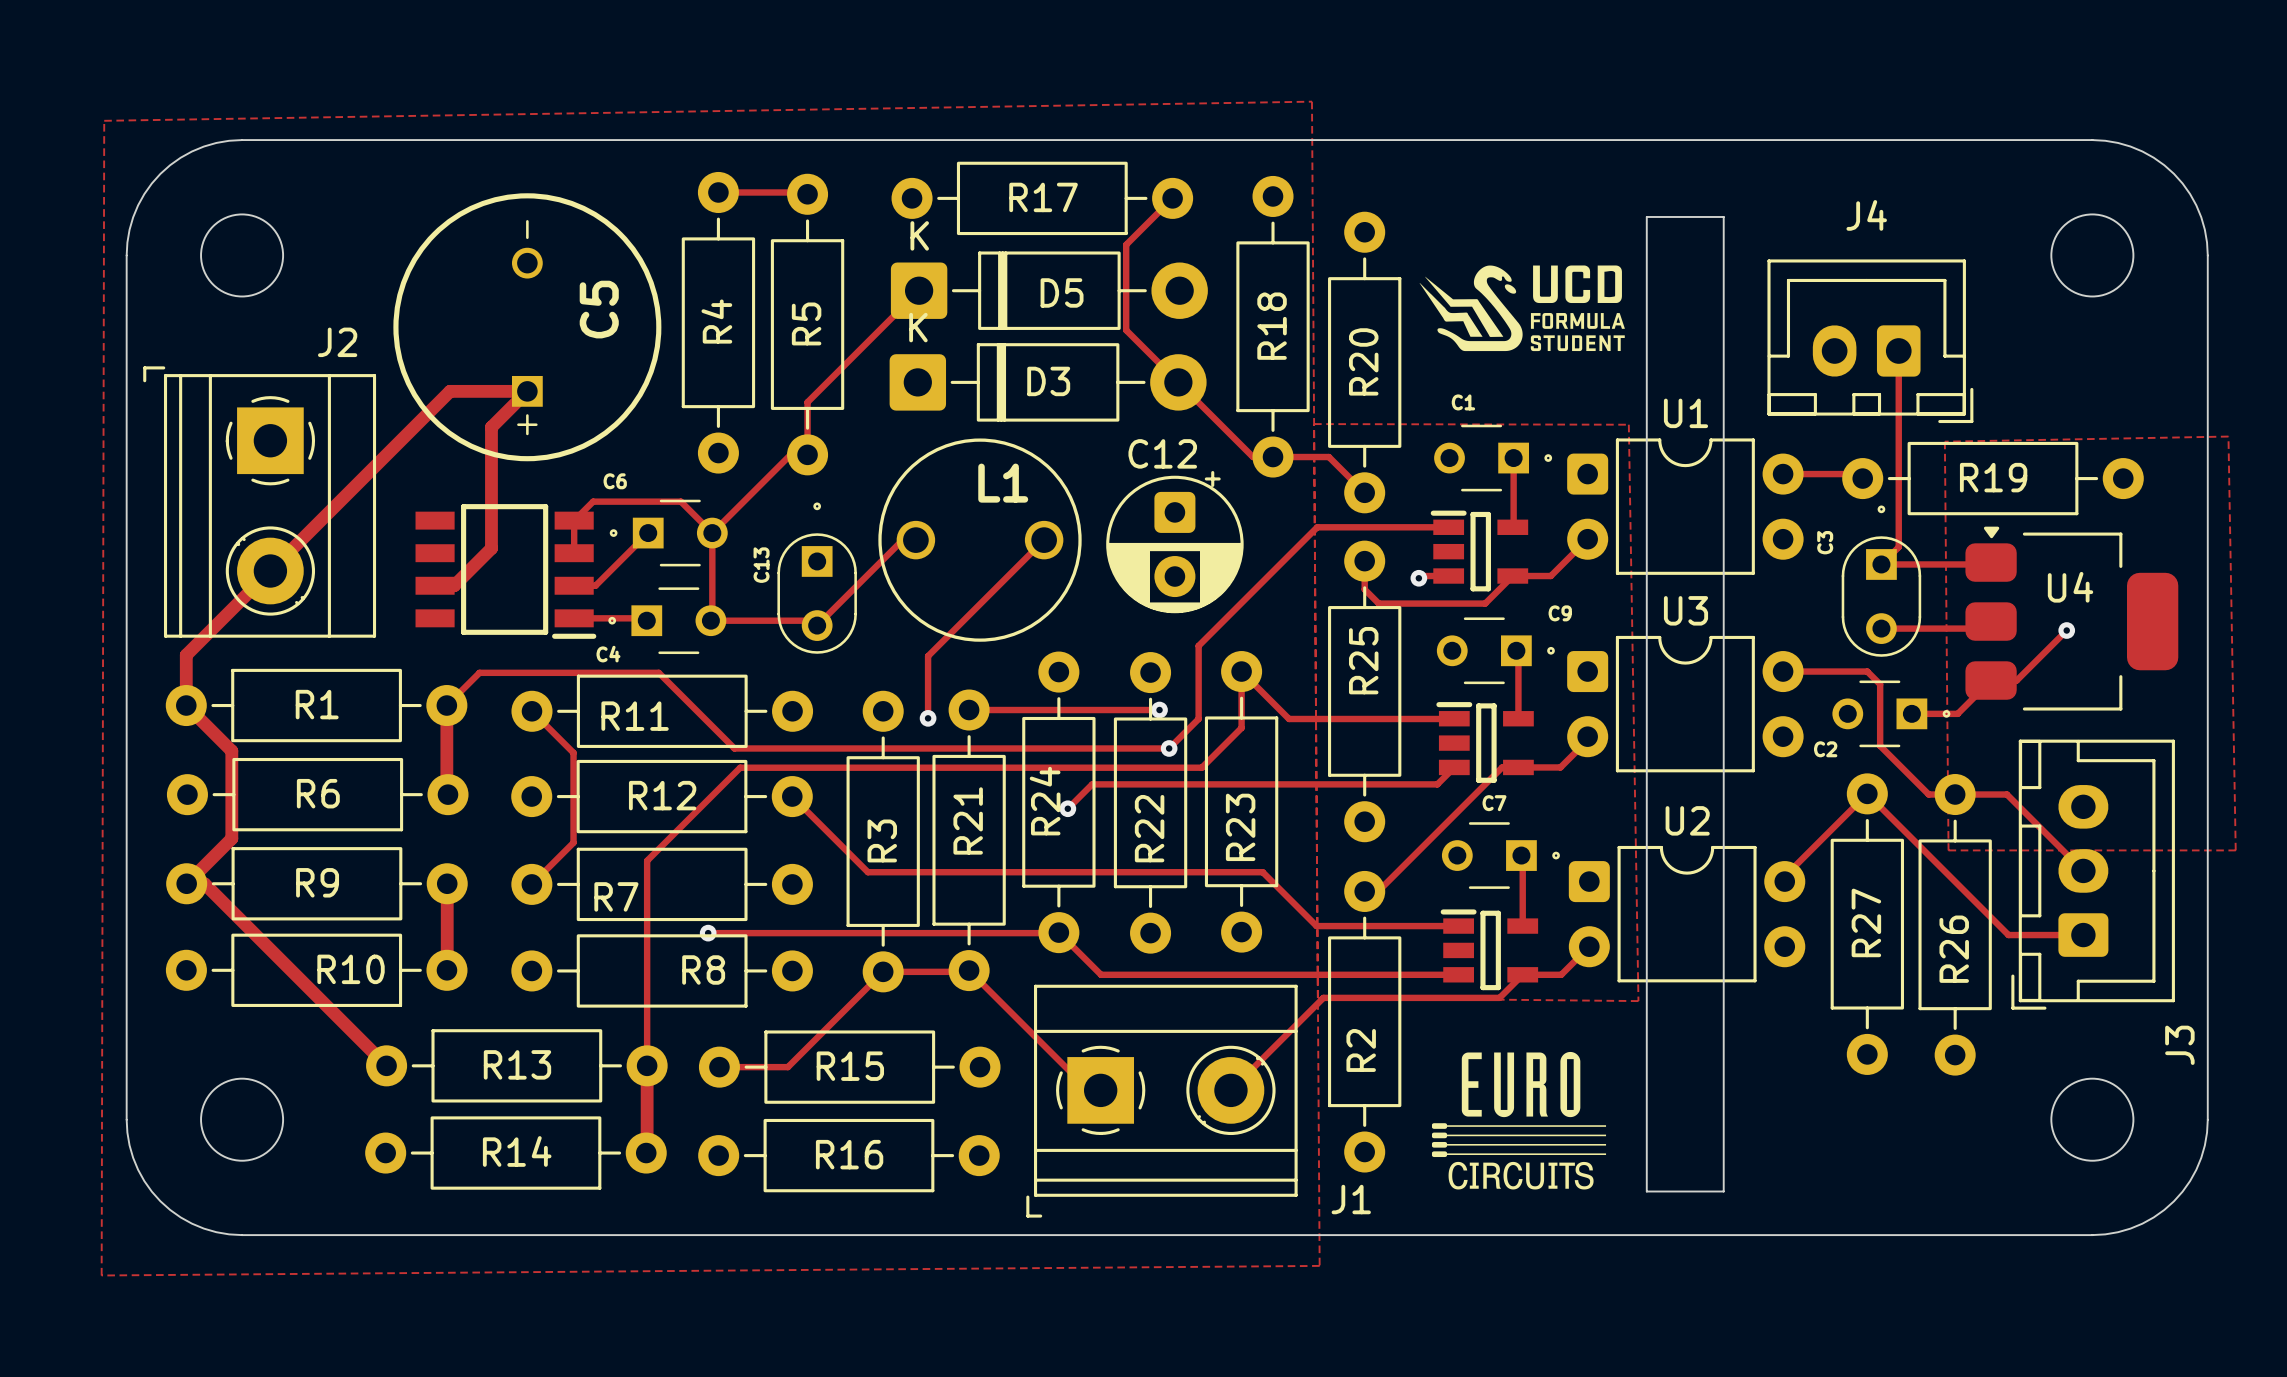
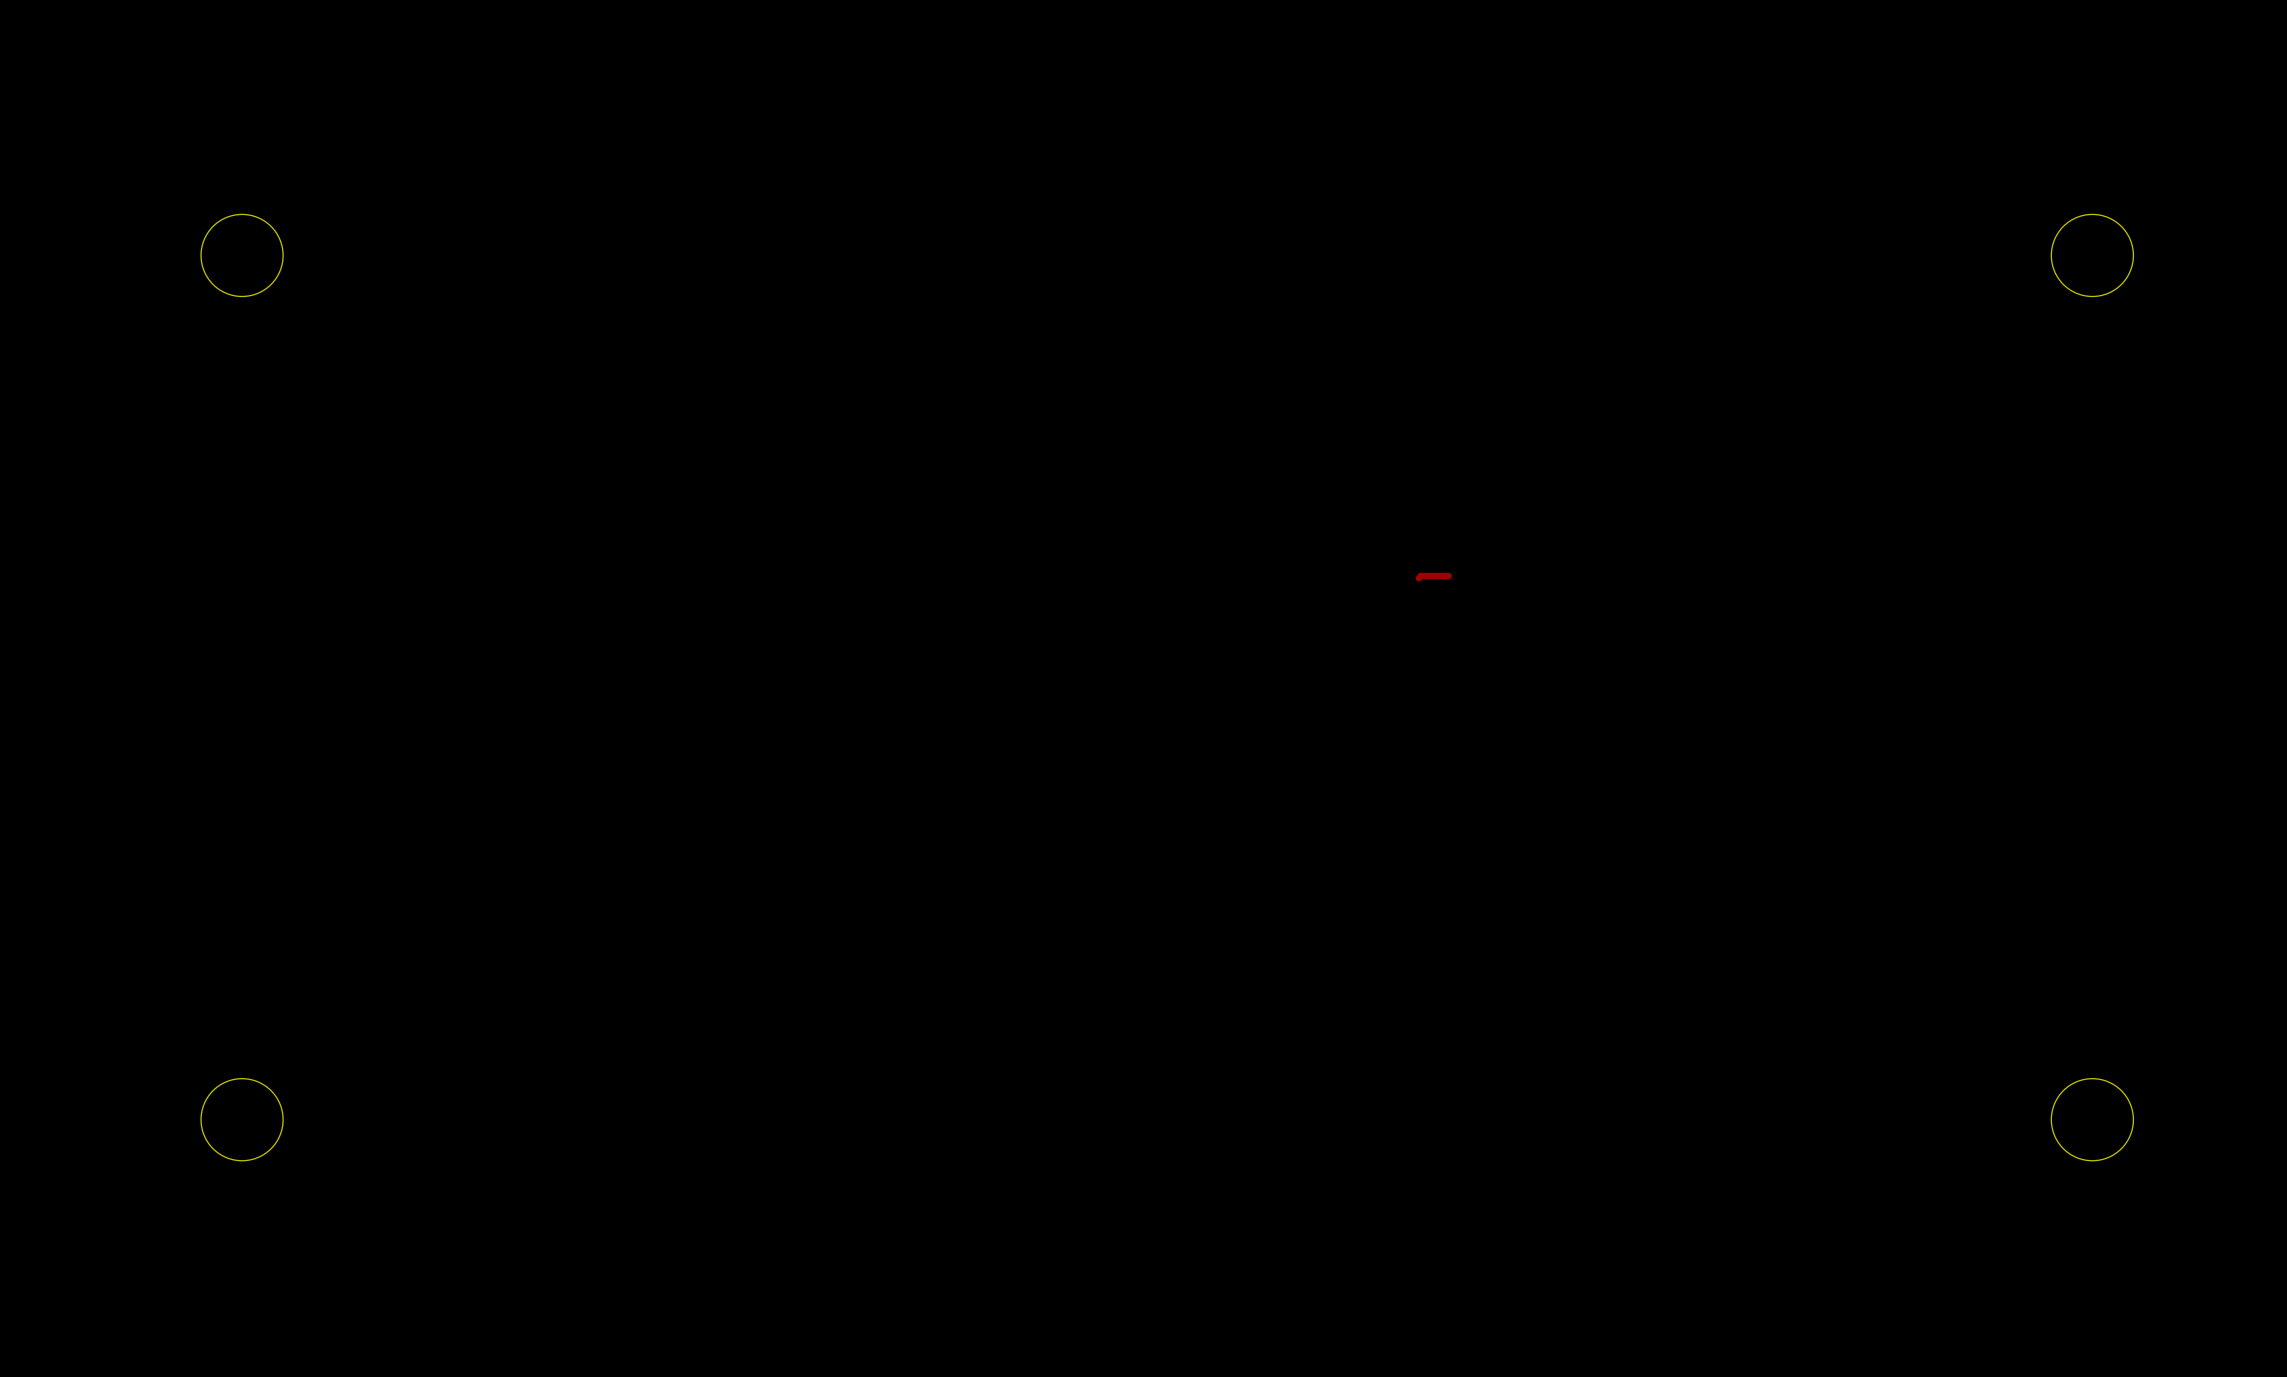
zone outline: (1311, 101) (104, 120) (101, 1275) (1319, 1265) (1311, 101) -> none
board edge: (242, 140) (2092, 140) (2118, 142) (2142, 151) (2173, 173) (2190, 194) (2201, 217) (2207, 255) (2207, 1119) (2204, 1145) (2196, 1169) (2182, 1191) (2153, 1217) (2118, 1232) (2092, 1235) (242, 1235) (216, 1232) (192, 1223) (170, 1209) (151, 1191) (138, 1169) (127, 1132) (126, 255) (129, 229) (138, 205) (160, 173) (180, 157) (203, 146) (242, 140) -> none
track: (718, 192) (805, 192) (807, 194) -> none
R17: (1042, 198) -> none
track: (1172, 198) (1126, 244) (1126, 330) (1253, 457) (1328, 457) (1364, 492) -> none
board edge: (1646, 216) (1723, 216) (1723, 1191) (1646, 1191) (1646, 216) -> none
drawing: [1419, 265, 1625, 352] -> none
track: (919, 290) (807, 402) (807, 454) (790, 454) (712, 533) -> none
D5: (1049, 290) -> none
R4: (718, 322) -> none
R5: (807, 324) -> none
R18: (1273, 326) -> none
C5: (527, 327) -> none
J4: (1870, 341) -> none
track: (1898, 350) (1898, 547) (1881, 564) (1989, 564) (1991, 562) -> none
R20: (1364, 362) -> none
D3: (1048, 382) -> none
zone outline: (1314, 424) (1317, 997) (1638, 1001) (1628, 424) (1314, 424) -> none
zone outline: (2228, 436) (2235, 850) (1948, 850) (1944, 441) (2228, 436) -> none
C1: (1493, 458) -> none
track: (1513, 458) (1512, 527) -> none
track: (1783, 474) (1858, 474) (1862, 478) -> none
R19: (1993, 478) -> none
J2: (259, 502) -> none
U1: (1685, 506) -> none
track: (1448, 527) (1317, 527) (1198, 645) (1198, 718) (1169, 748) (734, 748) (658, 672) (479, 672) (446, 705) (448, 794) -> none
track: (648, 533) (595, 585) (574, 585) -> none
C6: (668, 533) -> none
track: (712, 533) (710, 620) (812, 620) (817, 625) (902, 540) (915, 540) -> none
track: (712, 533) (680, 501) (593, 501) (574, 520) (574, 553) -> none
track: (1587, 539) (1550, 576) (1512, 576) (1485, 603) (1378, 603) (1364, 589) (1364, 561) -> none
L1: (980, 540) -> none
track: (1044, 540) (928, 656) (928, 718) -> none
C12: (1174, 542) -> none
part: (1479, 551) -> none
part: (505, 571) -> none
C13: (817, 578) -> none
via: (1418, 578) -> none
C3: (1881, 581) -> none
track: (435, 585) (454, 585) (491, 548) (491, 427) (527, 391) (450, 391) (186, 655) (186, 705) (231, 751) (231, 838) (186, 883) (204, 883) (386, 1065) -> none
track: (574, 618) (644, 618) (646, 620) -> none
U4: (2071, 618) -> none
C4: (667, 620) -> none
track: (1991, 621) (1984, 628) (1881, 628) -> none
track: (2066, 630) (2016, 680) (1991, 680) (1957, 713) (1911, 713) -> none
via: (2066, 630) -> none
C9: (1495, 650) -> none
track: (1516, 650) (1518, 652) (1518, 718) -> none
track: (1783, 671) (1867, 671) (1880, 684) (1880, 745) (1928, 794) (2006, 794) (2083, 870) -> none
R25: (1364, 691) -> none
U3: (1685, 704) -> none
R1: (316, 705) -> none
track: (969, 710) (1159, 710) -> none
via: (1159, 710) -> none
track: (531, 711) (573, 752) (573, 842) (531, 884) -> none
R11: (662, 711) -> none
C2: (1891, 713) -> none
via: (928, 718) -> none
track: (1454, 718) (1289, 718) (1241, 671) (1241, 727) (1201, 767) (740, 767) (647, 860) (646, 1153) -> none
track: (1587, 736) (1587, 740) (1560, 767) (1502, 767) (1378, 891) (1364, 891) -> none
part: (1485, 742) -> none
via: (1169, 748) -> none
track: (1454, 767) (1437, 784) (1092, 784) (1067, 808) -> none
R6: (317, 794) -> none
R12: (662, 796) -> none
track: (792, 796) (867, 872) (1262, 872) (1316, 926) (1458, 926) -> none
R23: (1241, 801) -> none
R24: (1058, 802) -> none
R22: (1150, 802) -> none
via: (1067, 808) -> none
R21: (969, 840) -> none
R3: (883, 841) -> none
C7: (1500, 855) -> none
track: (1521, 855) (1522, 926) -> none
J3: (2093, 874) -> none
track: (1784, 881) (1784, 876) (1867, 793) (2008, 935) (2083, 935) -> none
R9: (316, 883) -> none
track: (447, 883) (447, 970) -> none
R7: (662, 884) -> none
U2: (1687, 914) -> none
R27: (1867, 924) -> none
R26: (1955, 924) -> none
track: (708, 933) (1058, 932) (1101, 974) (1458, 974) -> none
via: (708, 933) -> none
track: (1589, 946) (1561, 974) (1522, 974) (1499, 997) (1323, 997) (1230, 1090) -> none
part: (1489, 949) -> none
R10: (316, 970) -> none
R8: (662, 970) -> none
R2: (1364, 1021) -> none
drawing: [1431, 1051, 1607, 1190] -> none
R13: (516, 1065) -> none
track: (719, 1067) (787, 1067) (883, 971) (969, 970) (1088, 1090) (1100, 1090) -> none
R15: (849, 1067) -> none
J1: (1161, 1101) -> none
R14: (515, 1153) -> none
R16: (848, 1155) -> none

